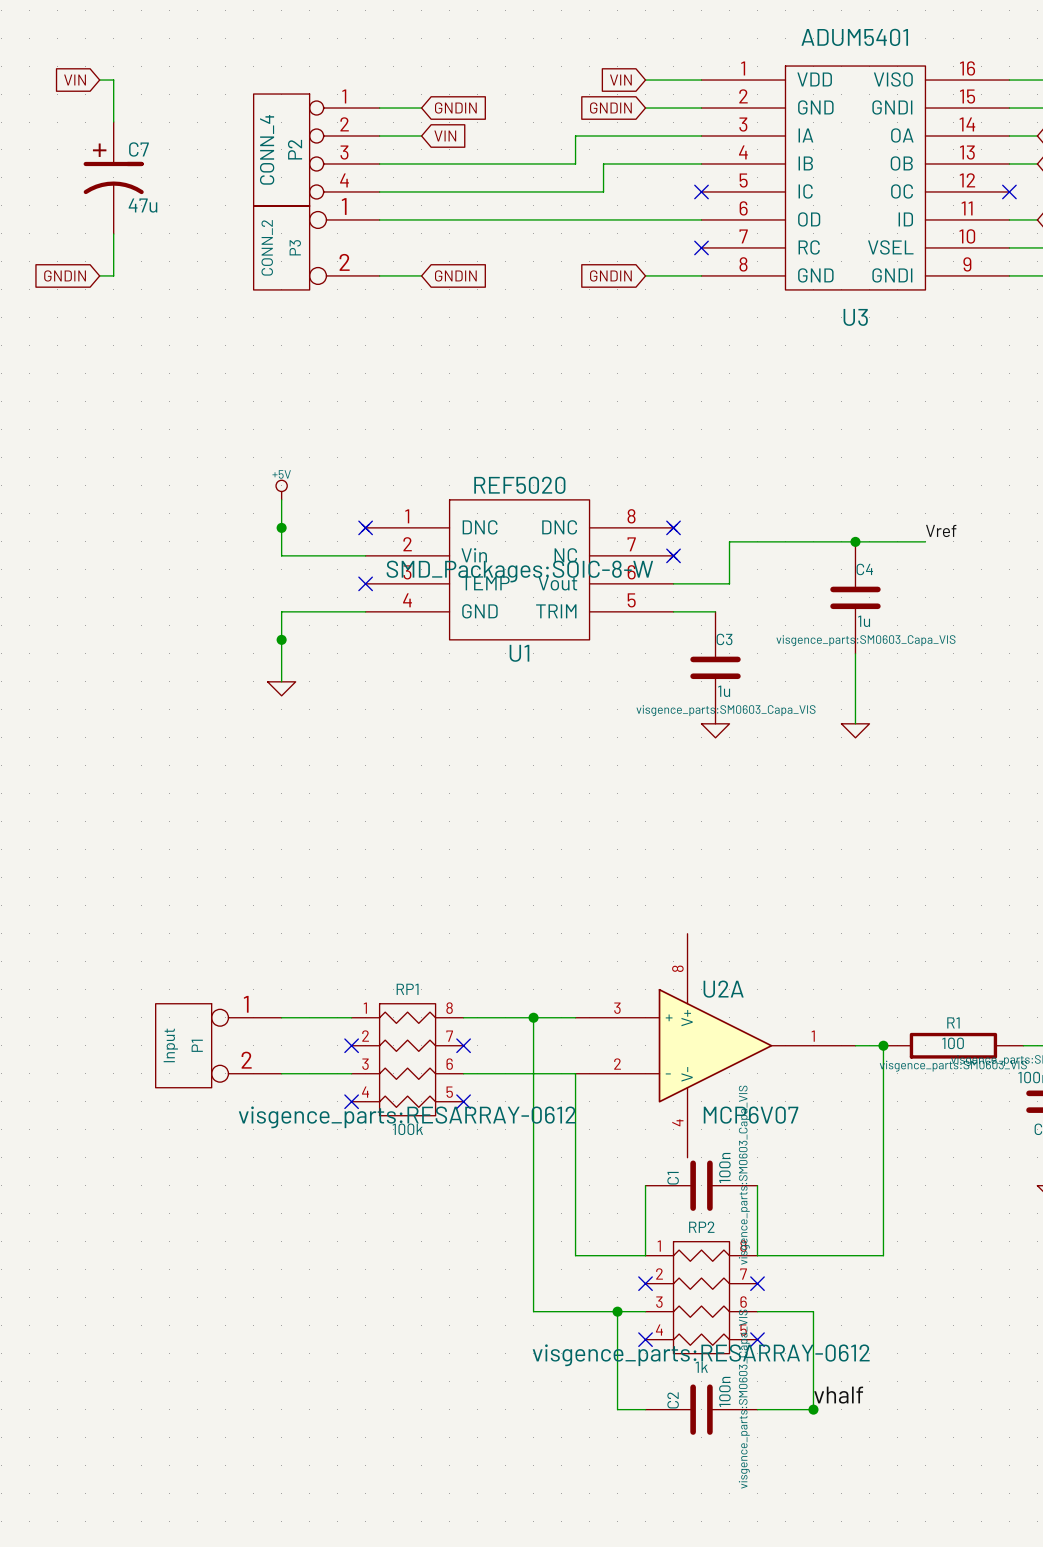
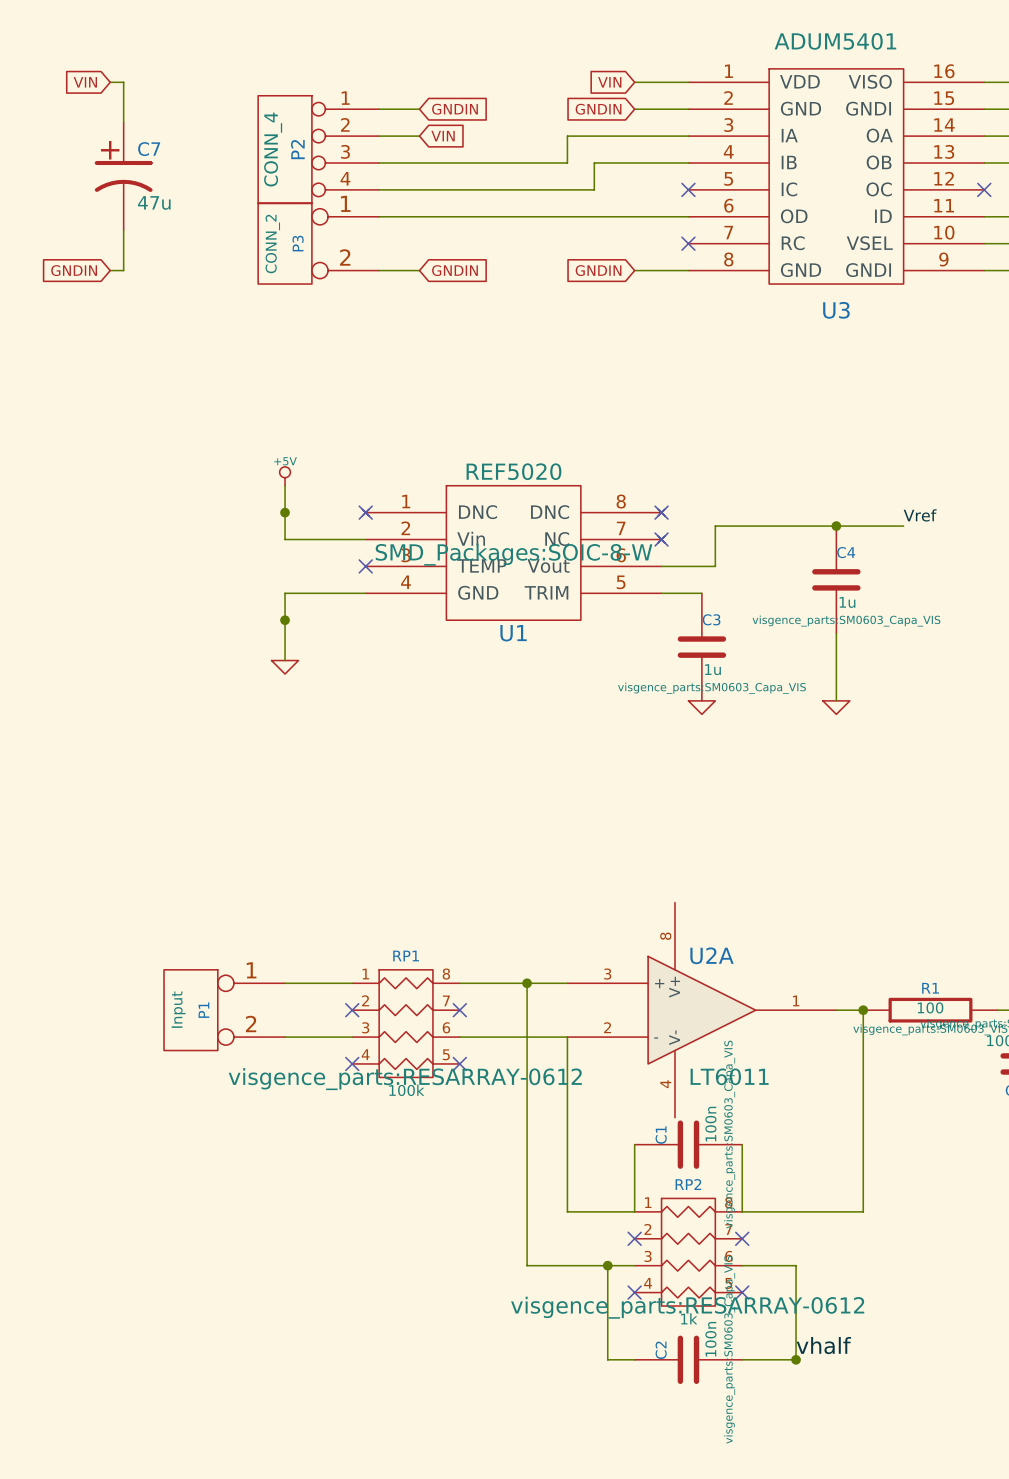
U2A value: MCP6V07 (751, 1115) -> LT6011 (729, 1076)

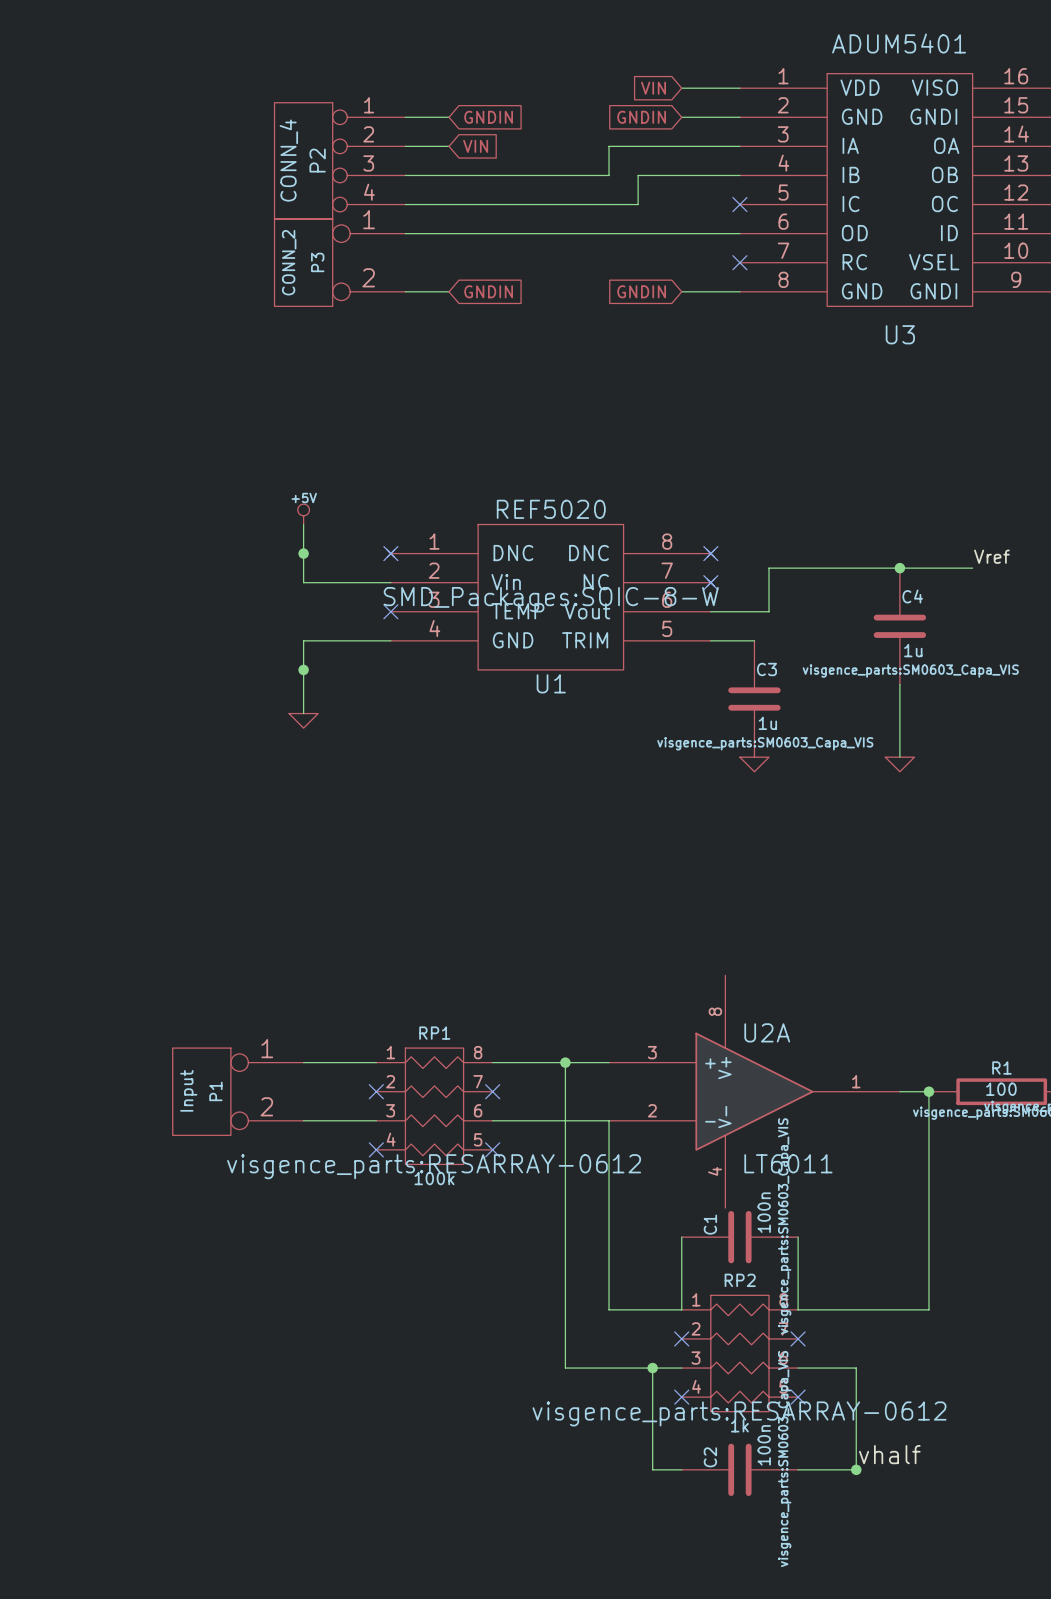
global label: VIN (85, 82) -> none
wire: (110, 82) (123, 82) (123, 122) -> none
C7: 47u (123, 176) -> none
wire: (123, 230) (123, 270) (110, 270) -> none
global label: GNDIN (74, 270) -> none

